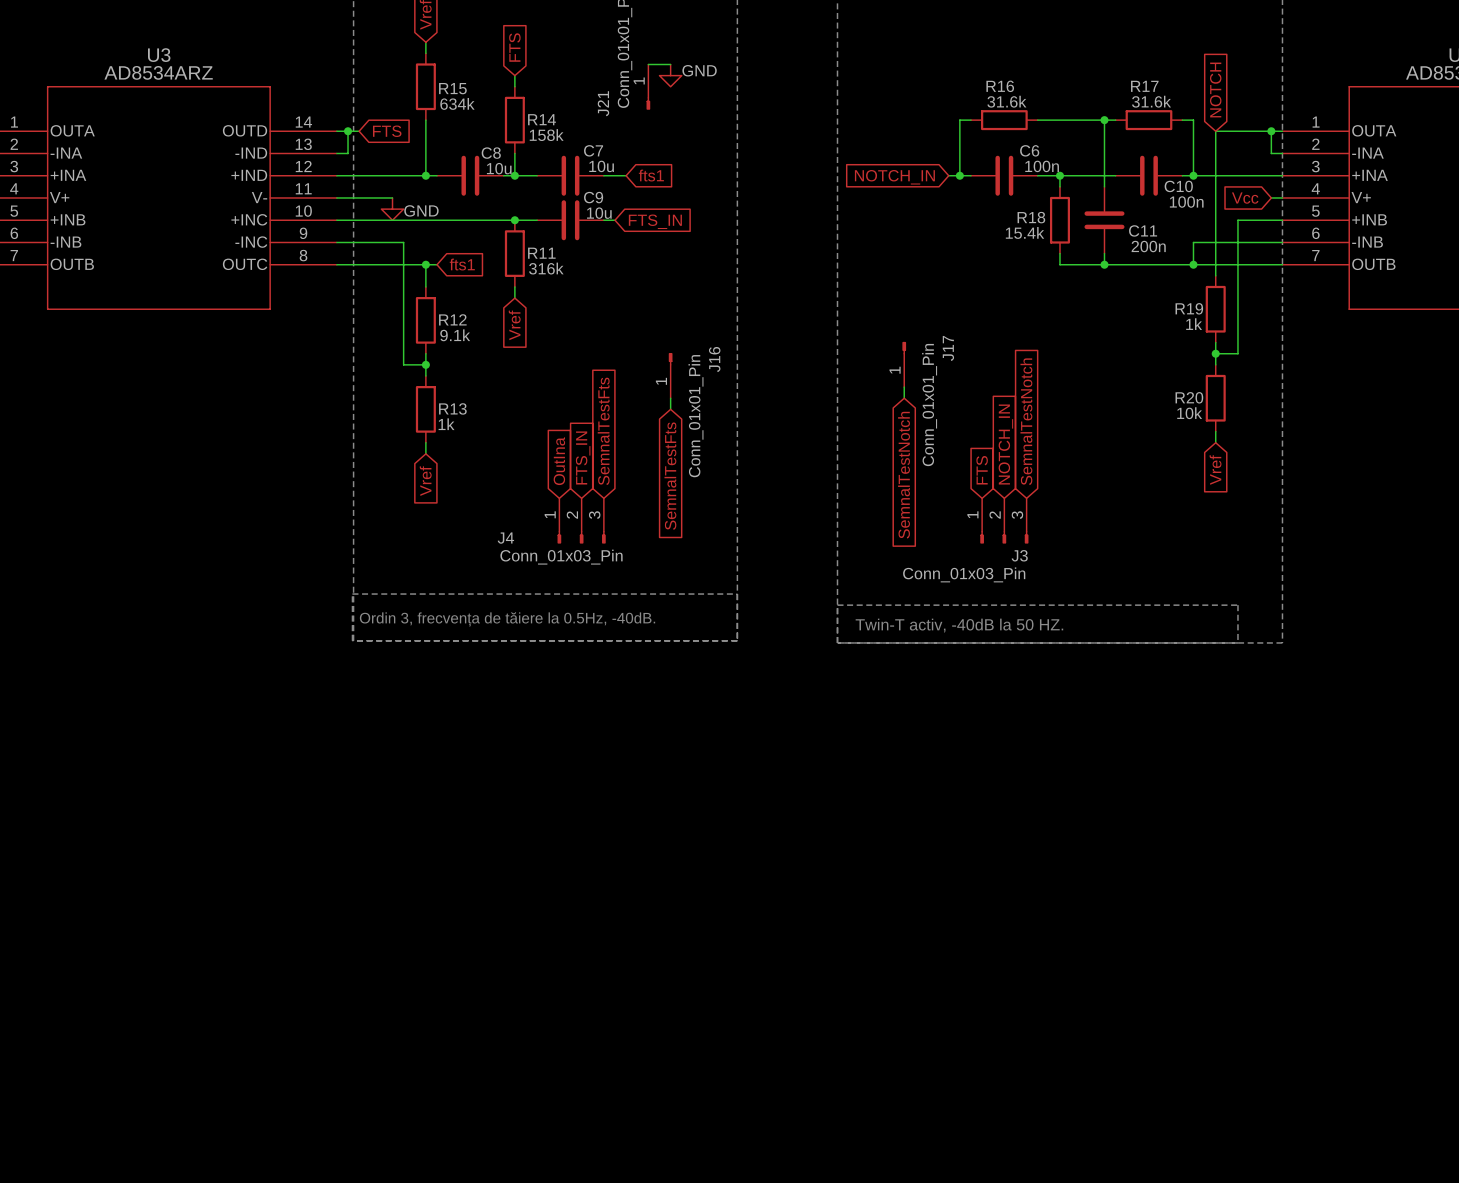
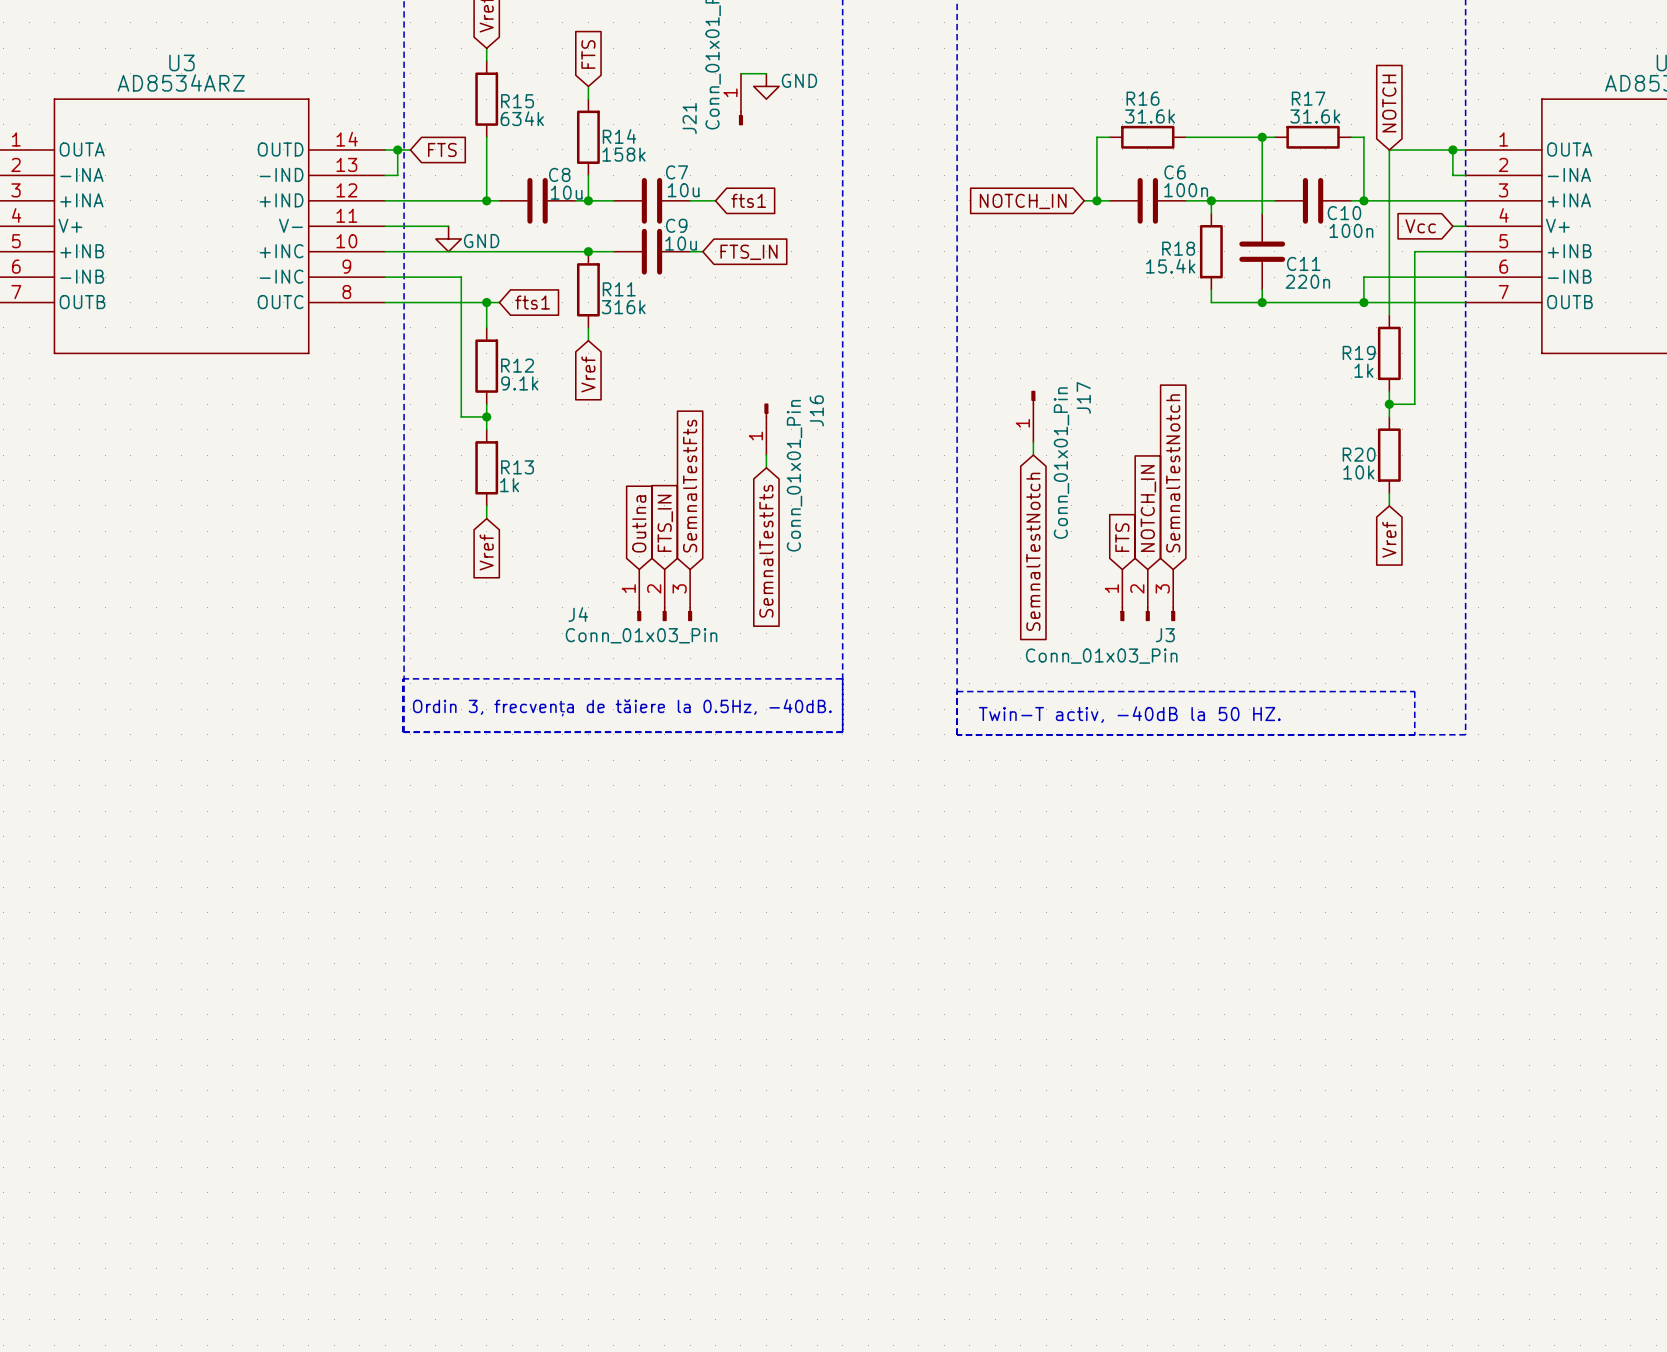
C11 value: 200n (1148, 246) -> 220n (1307, 281)

